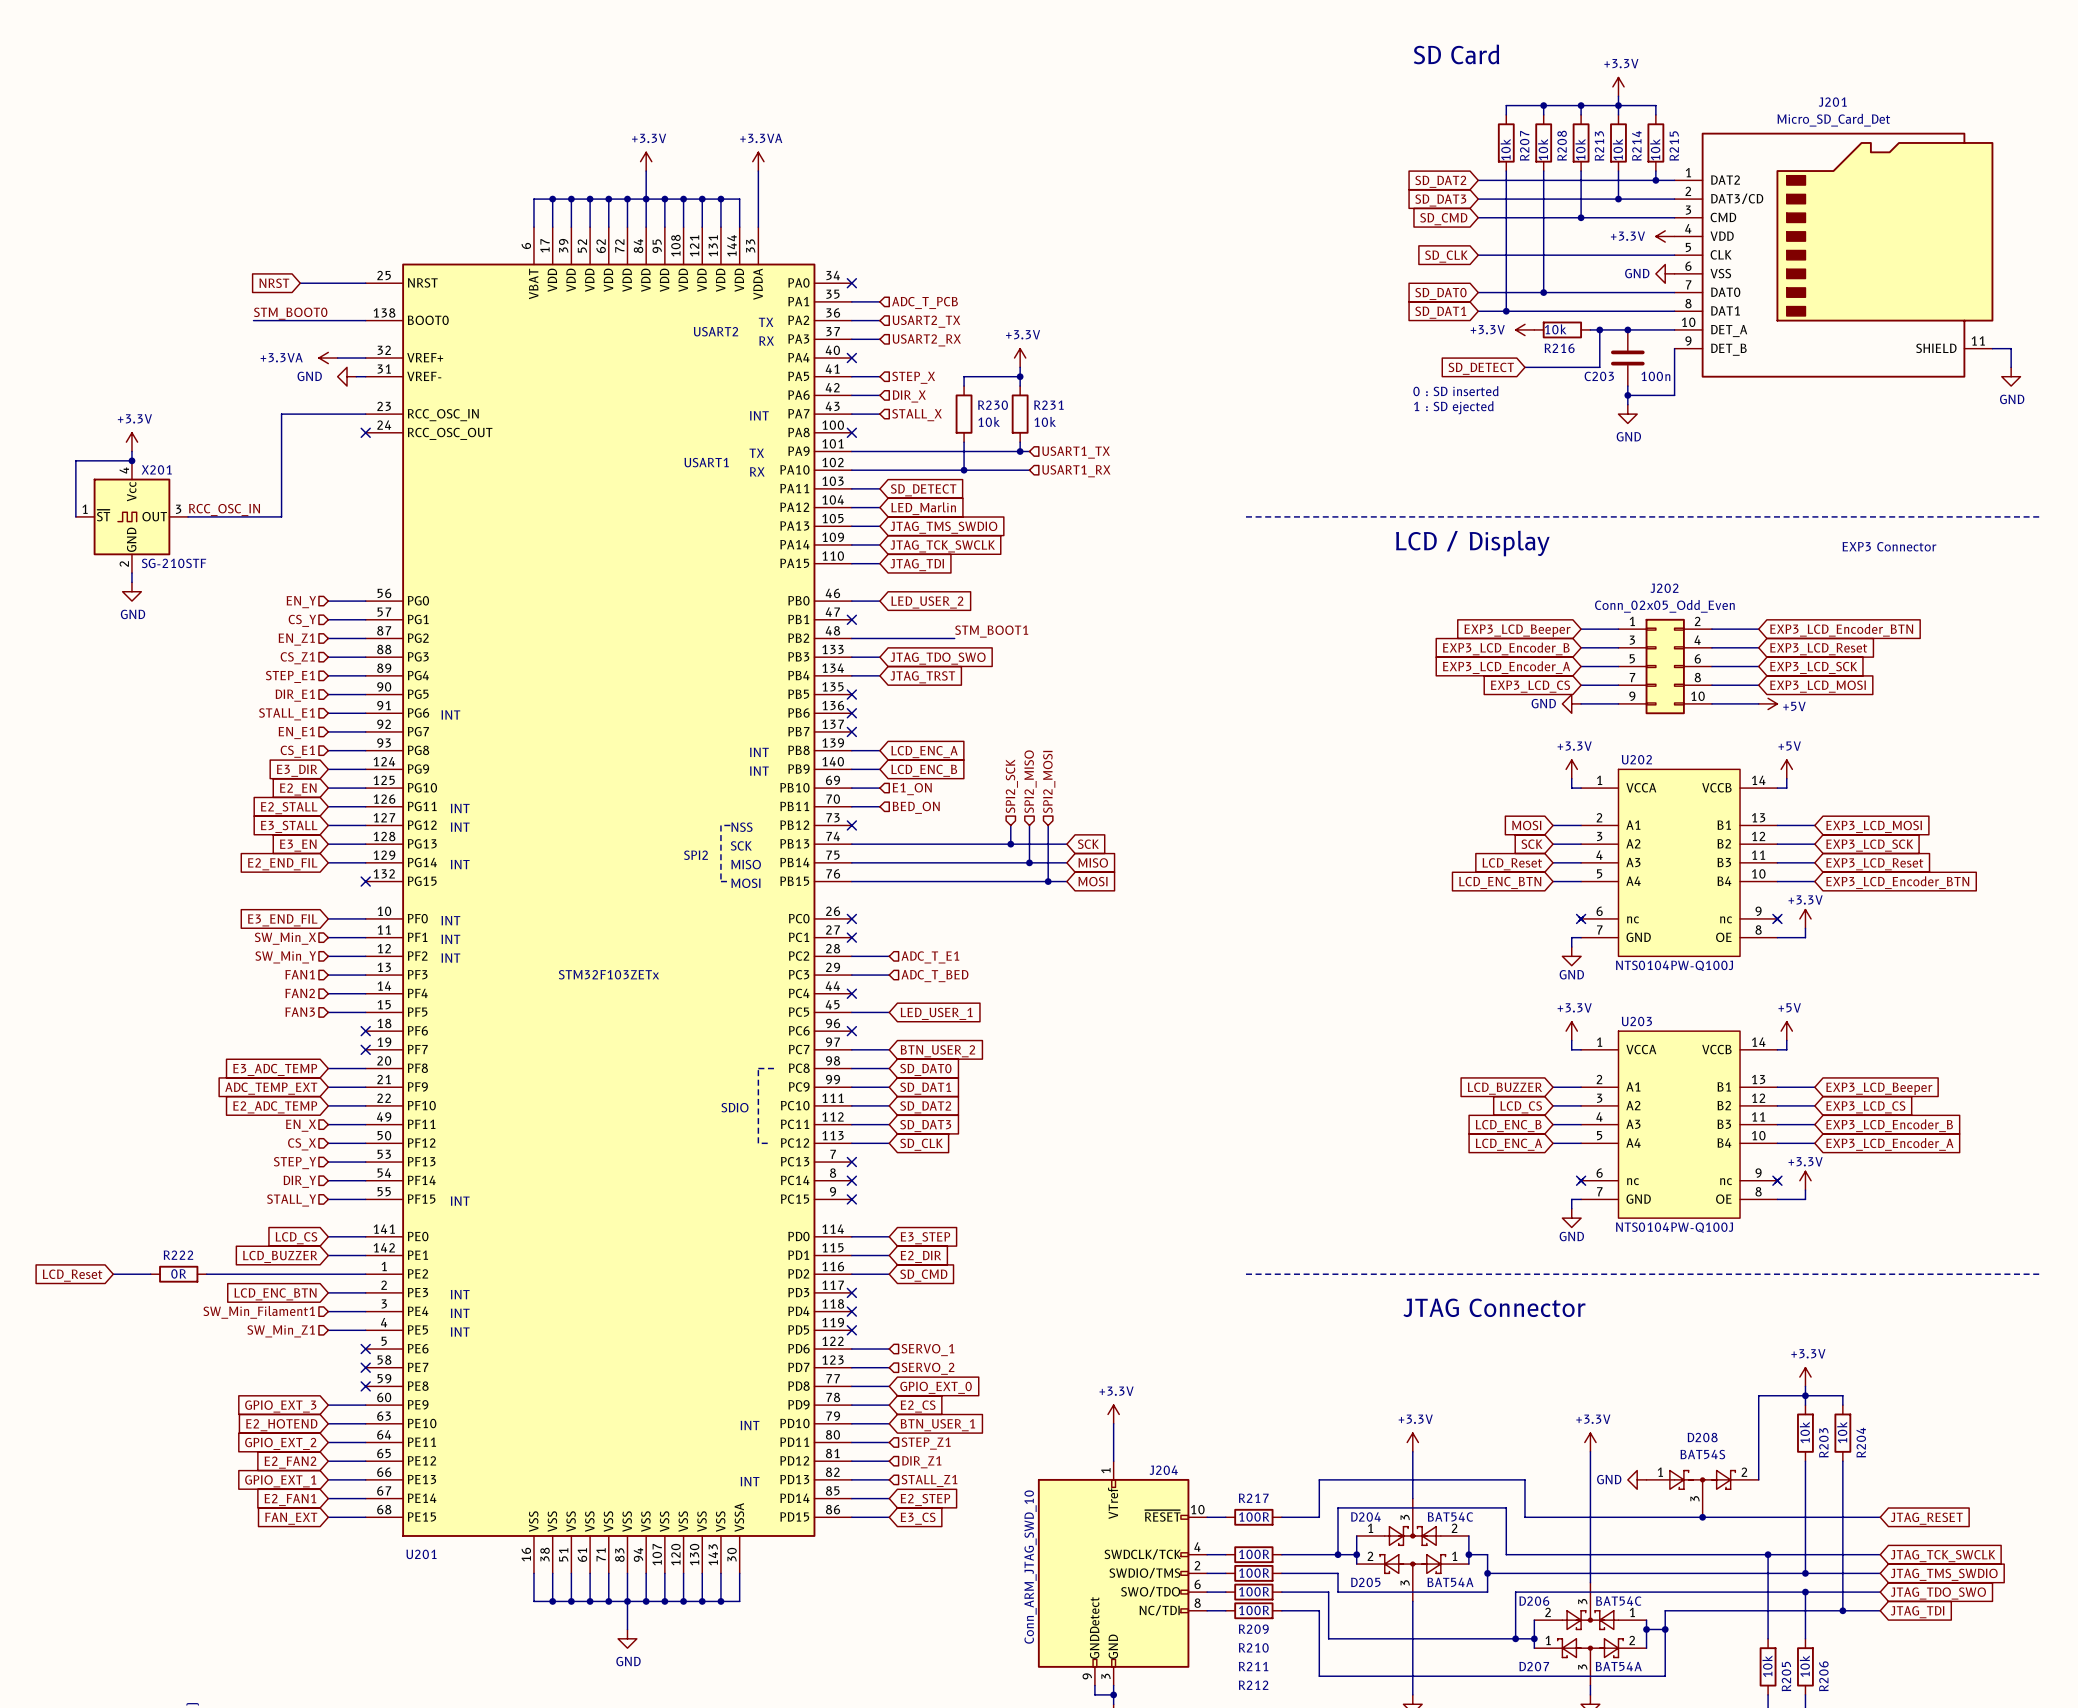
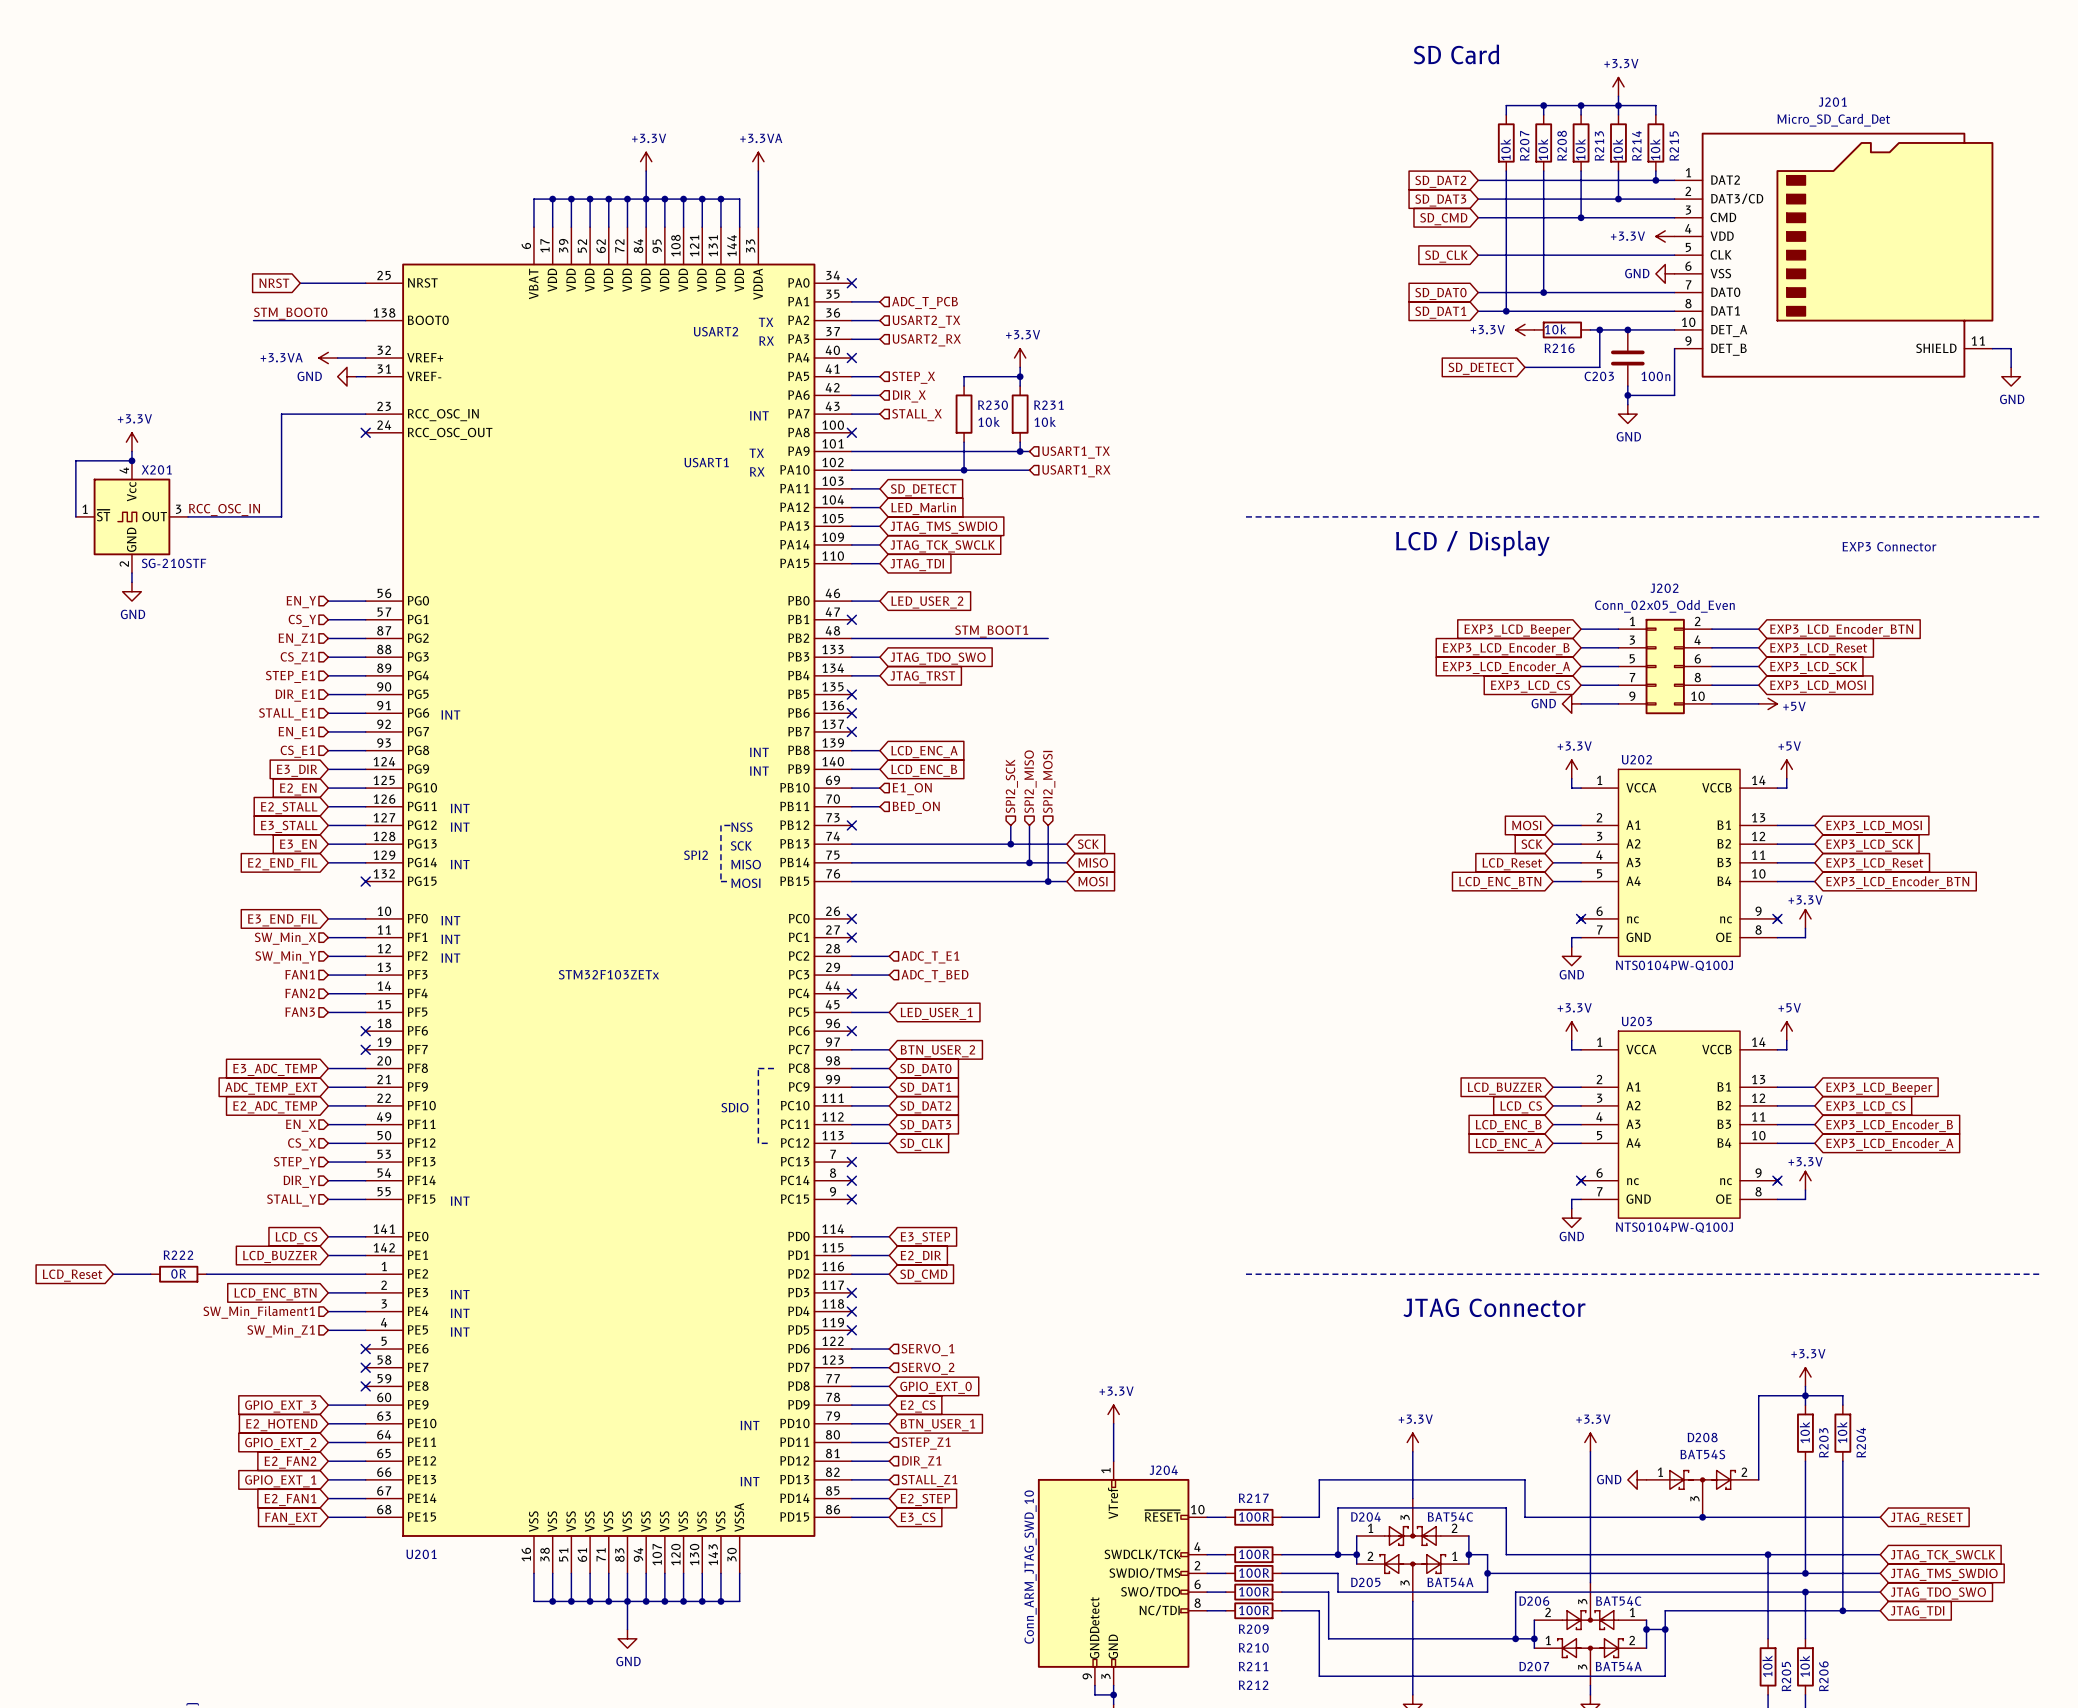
text: 0 : SD inserted (1455, 391) -> none
text: 1 : SD ejected (1453, 407) -> none
wire: none -> (954, 638) (1048, 638)

